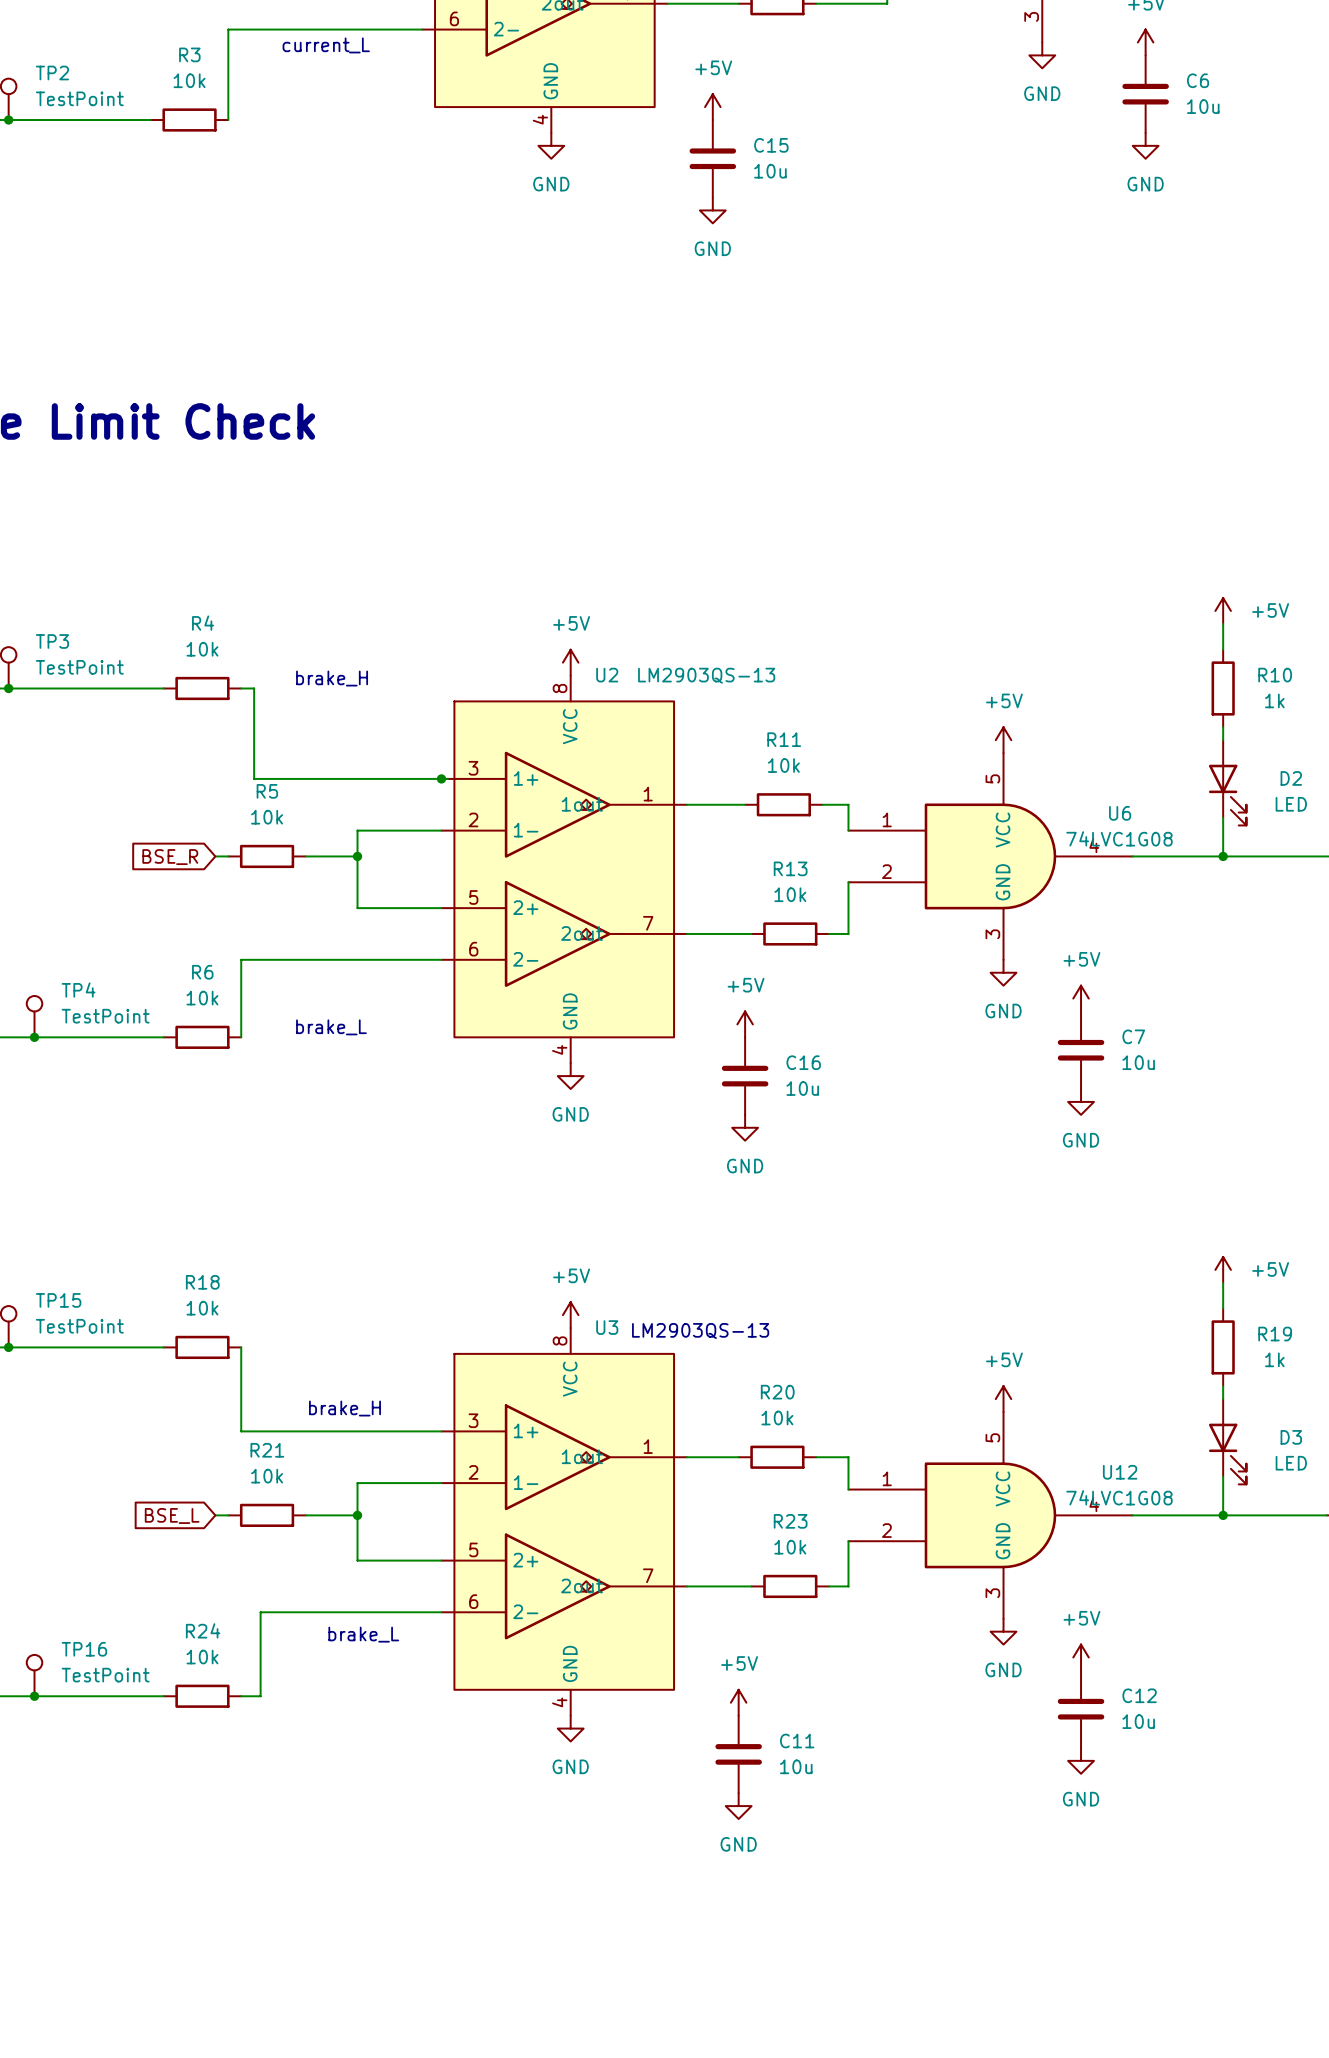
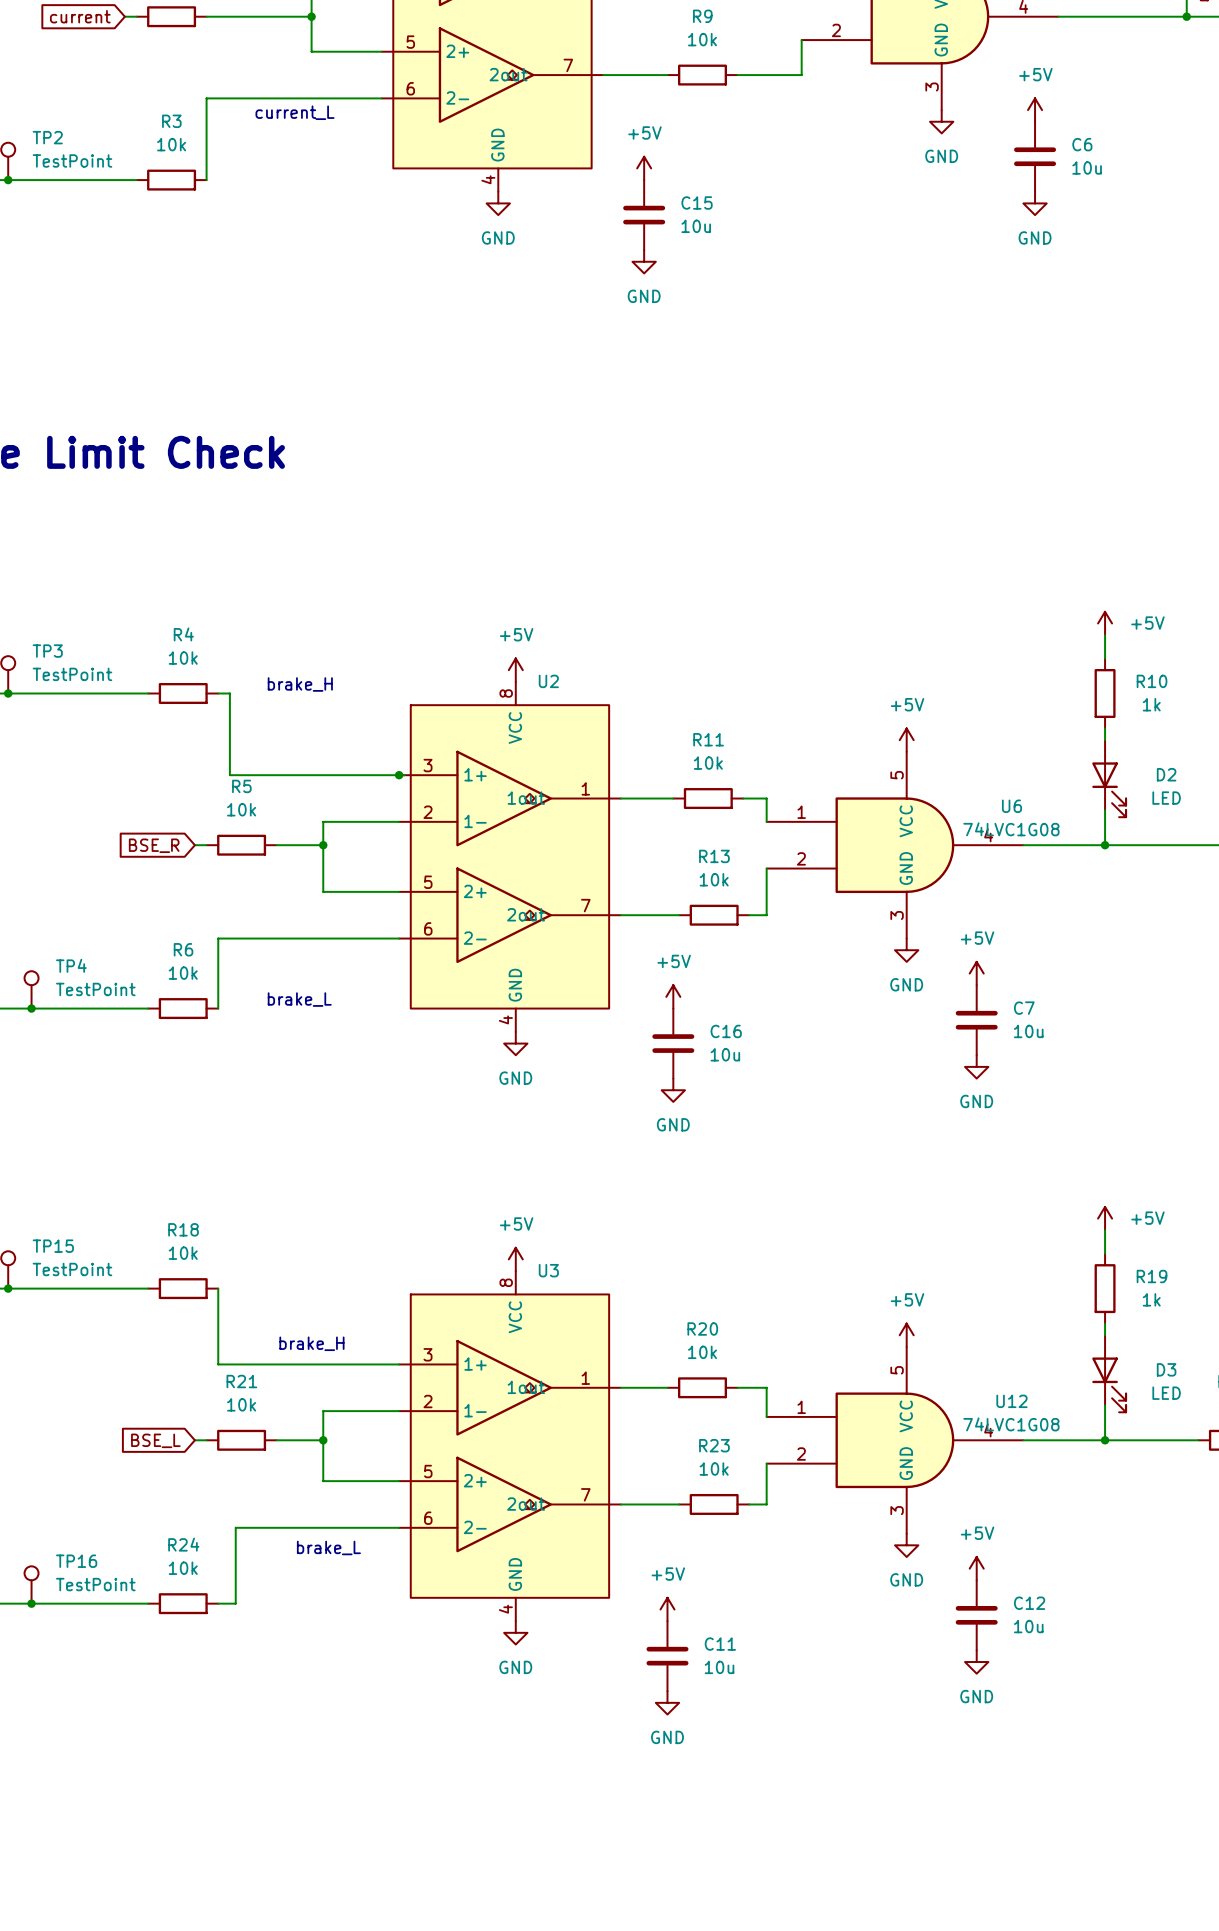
U2 value: LM2903QS-13 (706, 675) -> none
text: LM2903QS-13 (700, 1330) -> none

